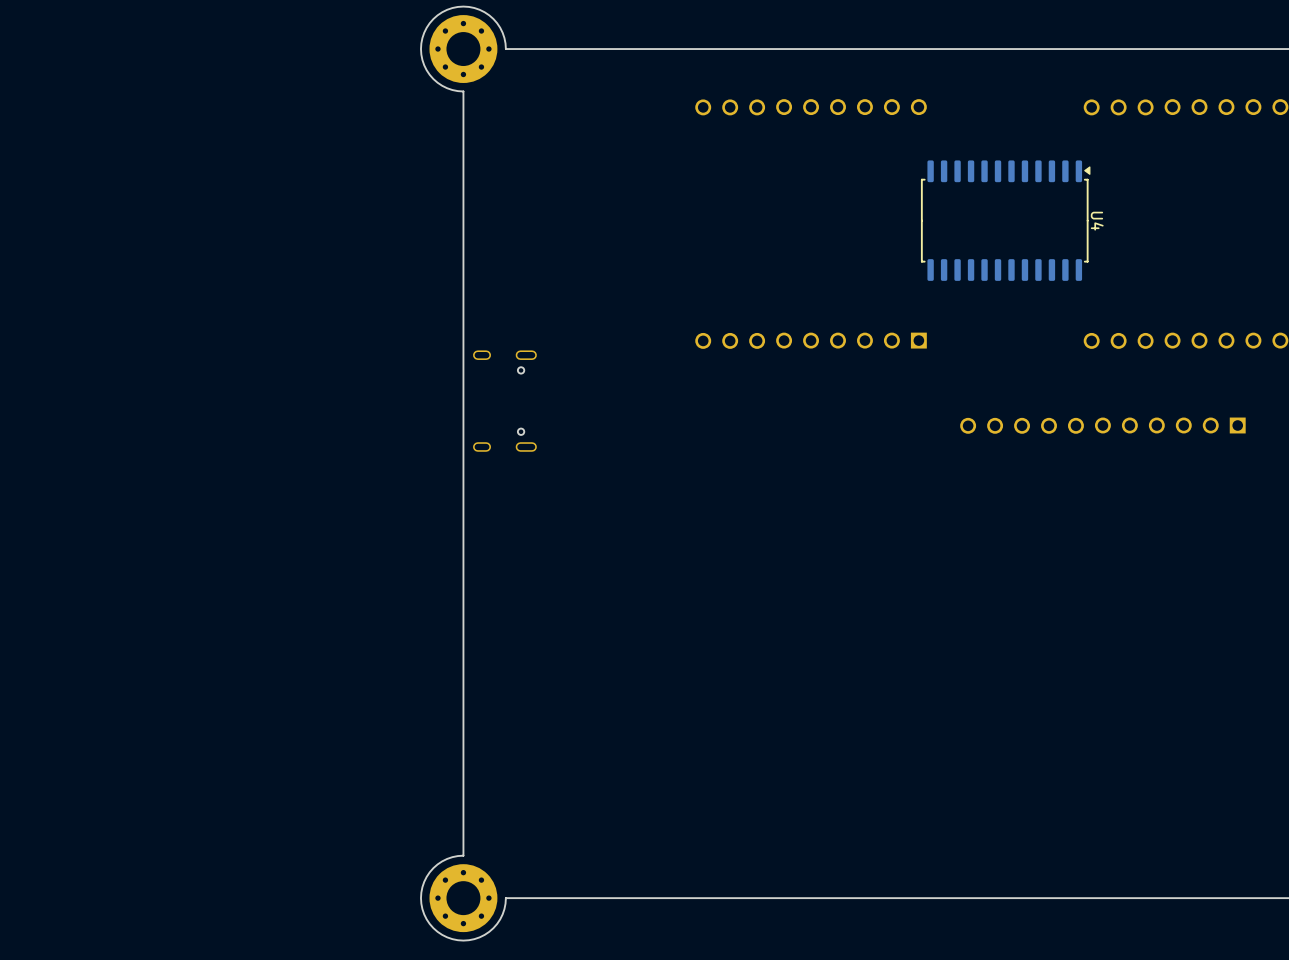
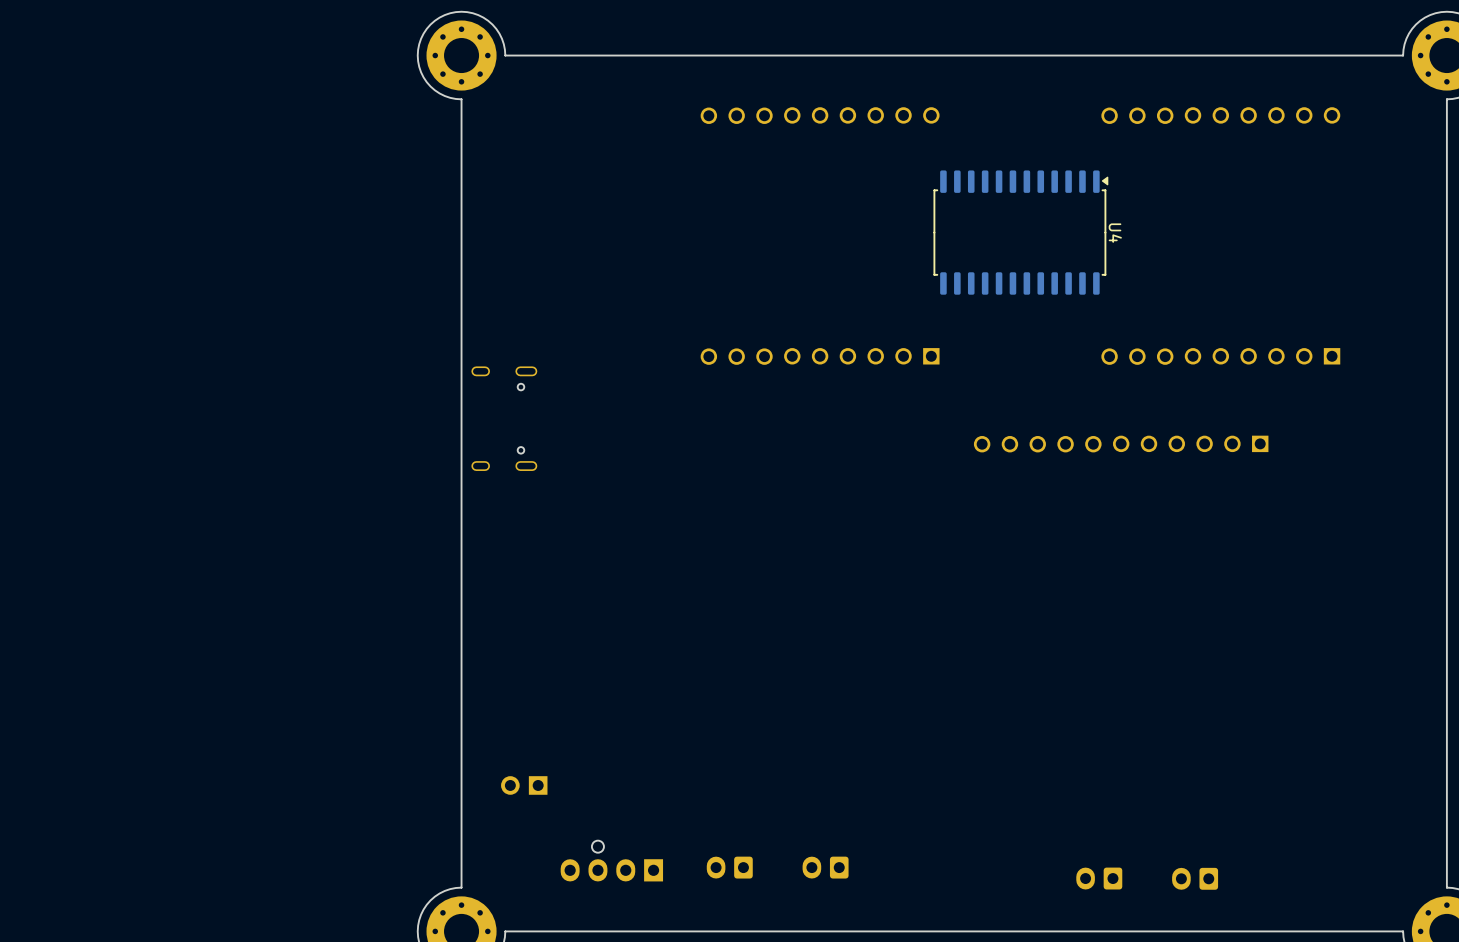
part: none -> (524, 785)
part: none -> (611, 861)
part: none -> (729, 867)
part: none -> (825, 867)
part: none -> (1099, 878)
part: none -> (1195, 878)

